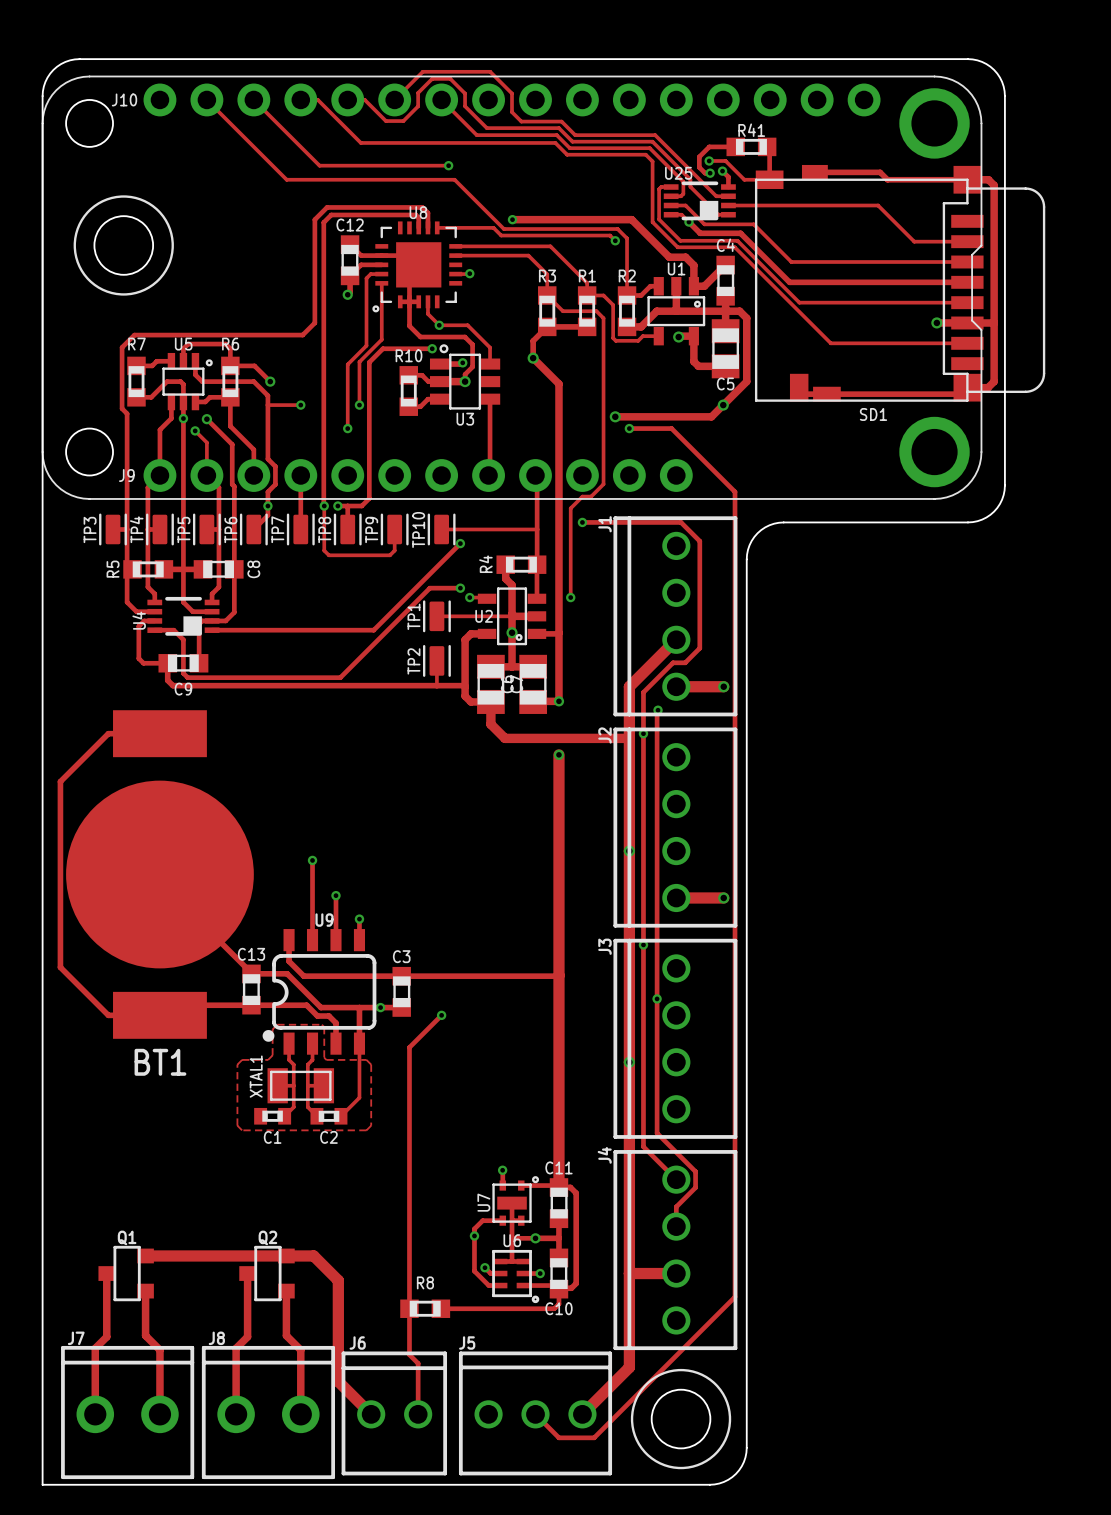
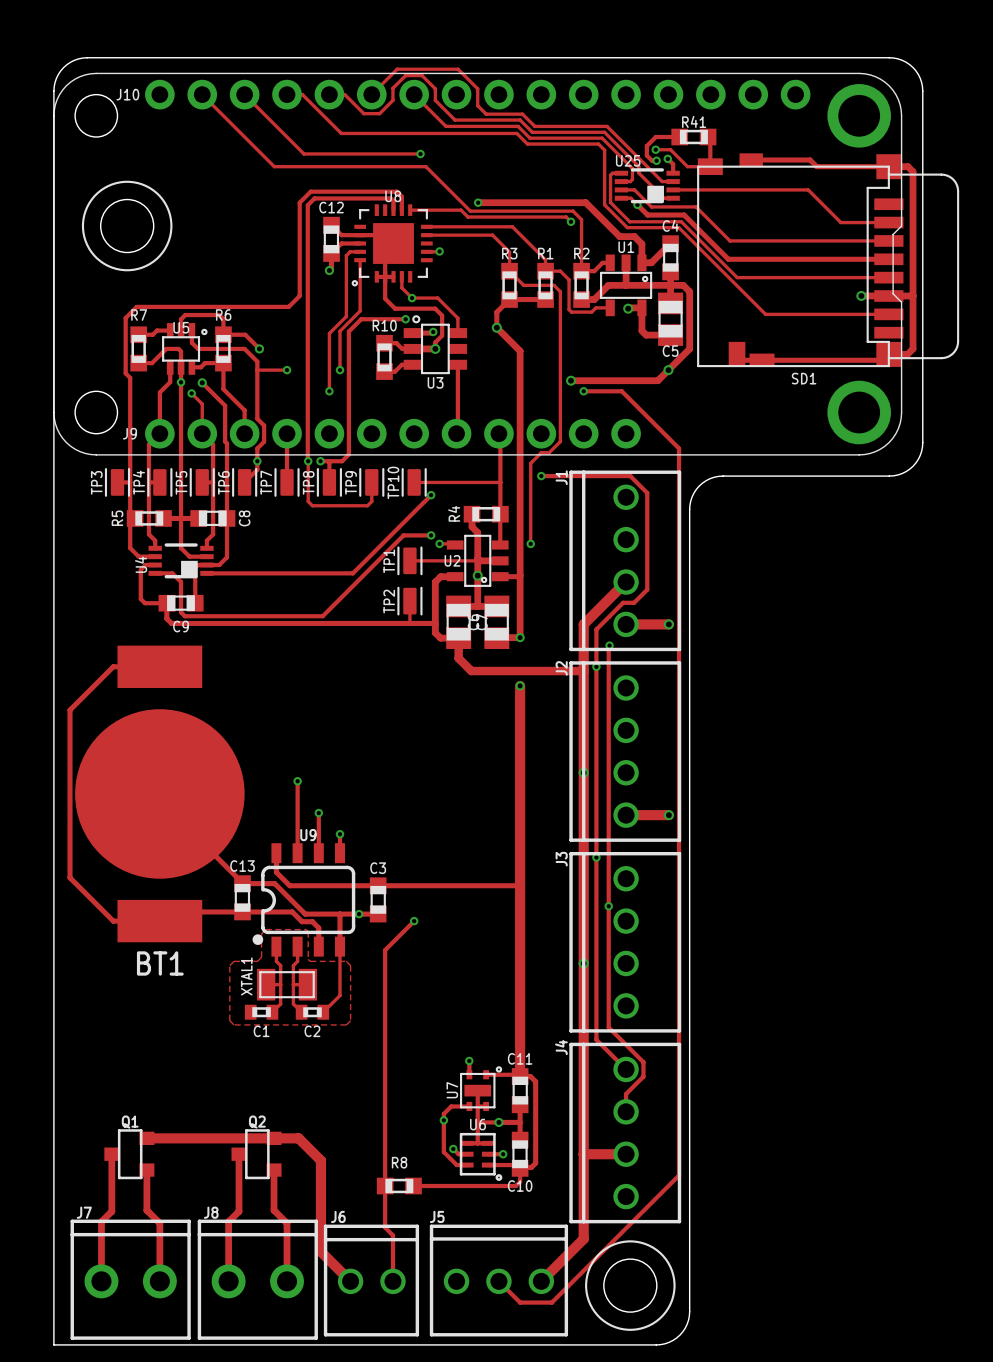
U5 name position: U5 (183, 344) -> U5 (181, 327)

